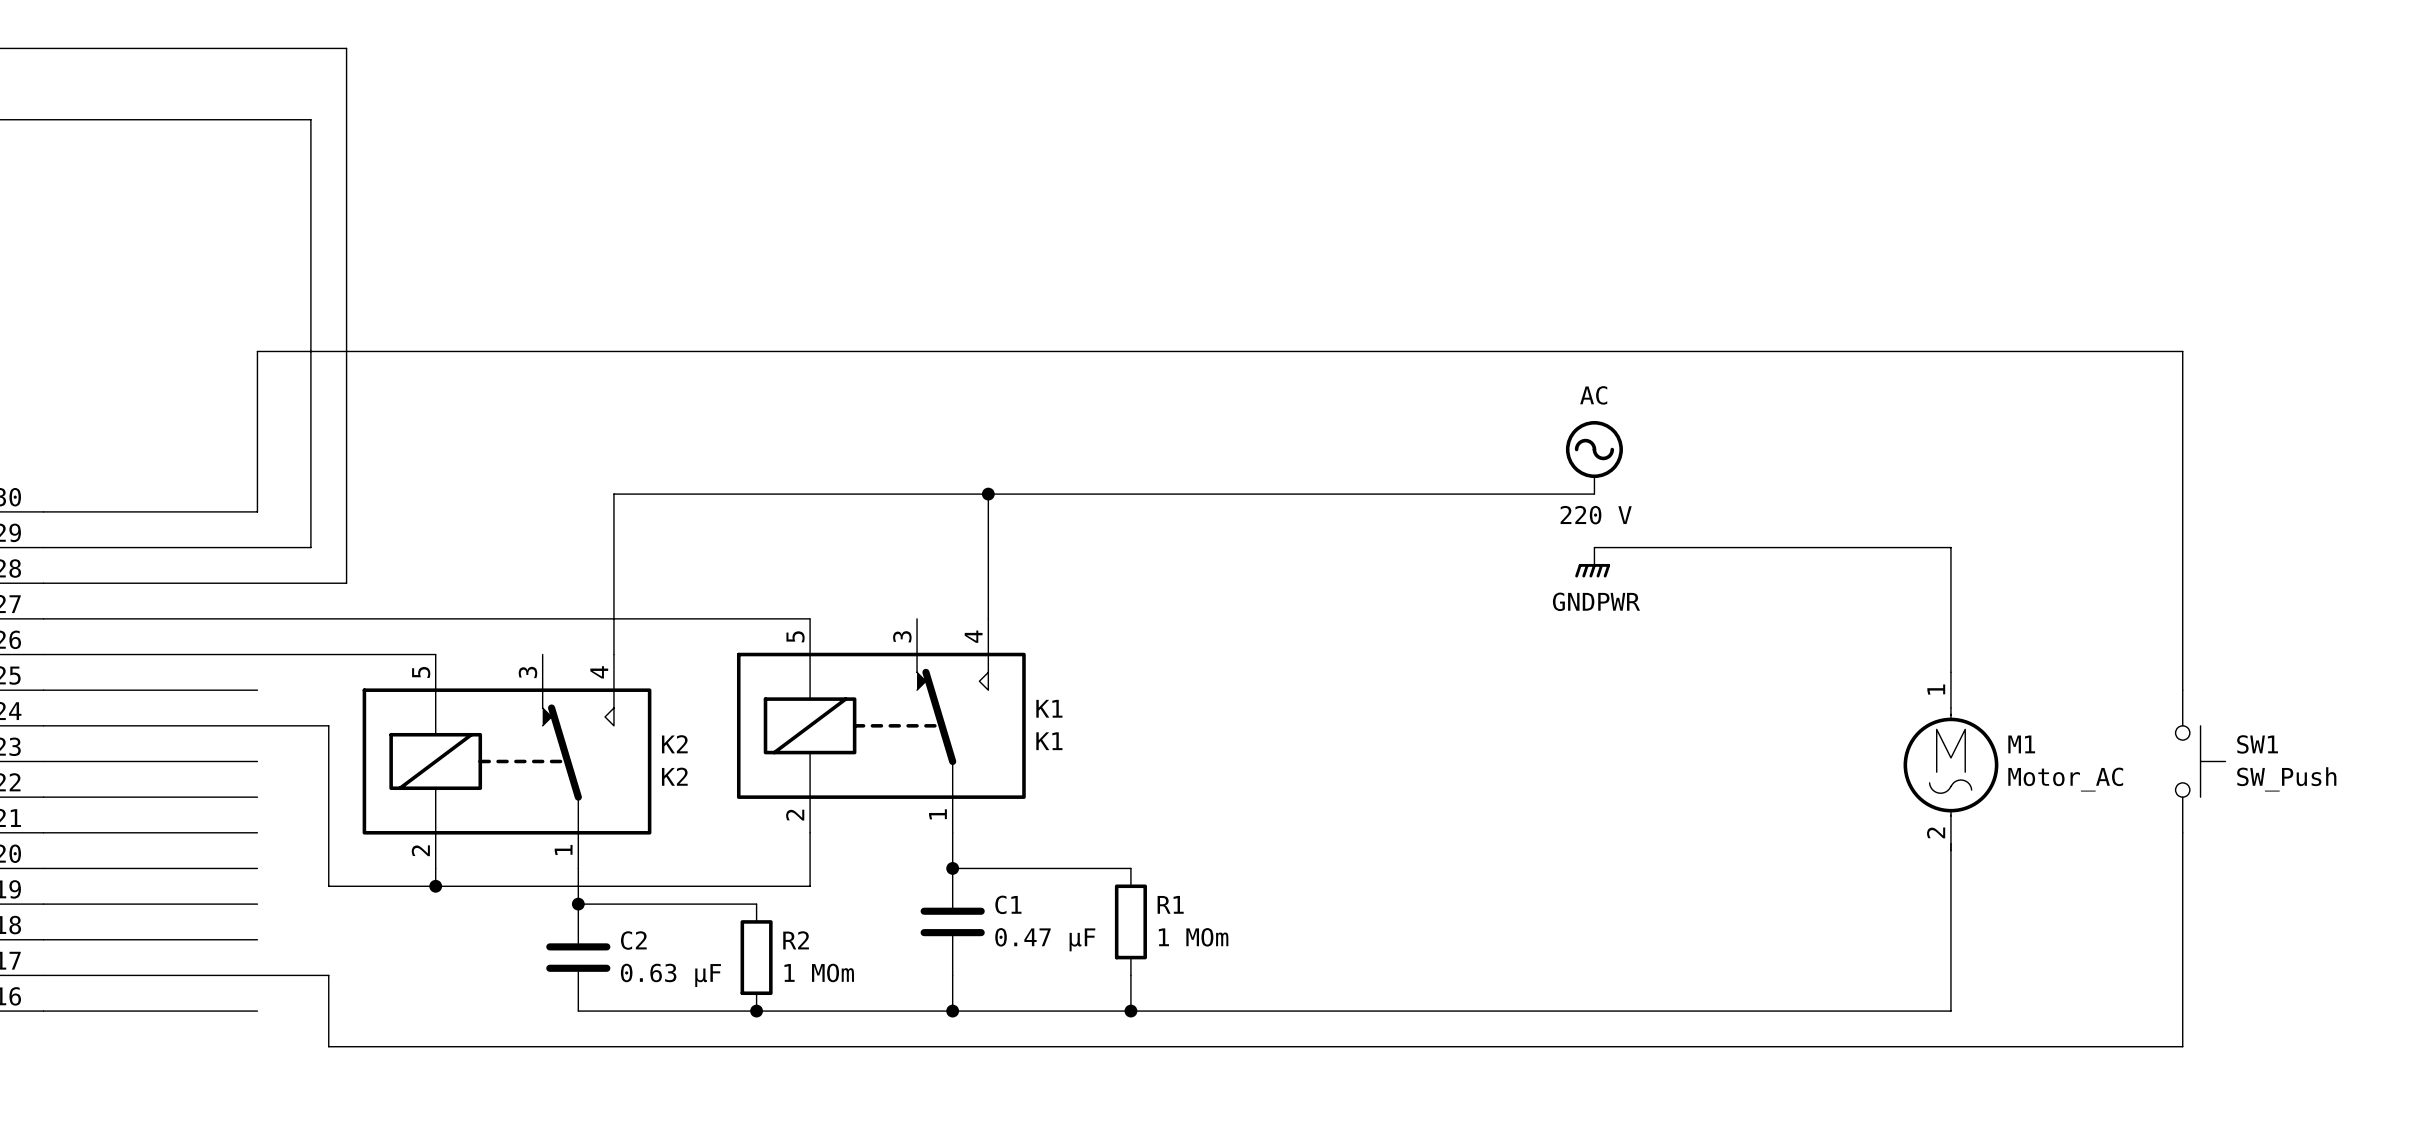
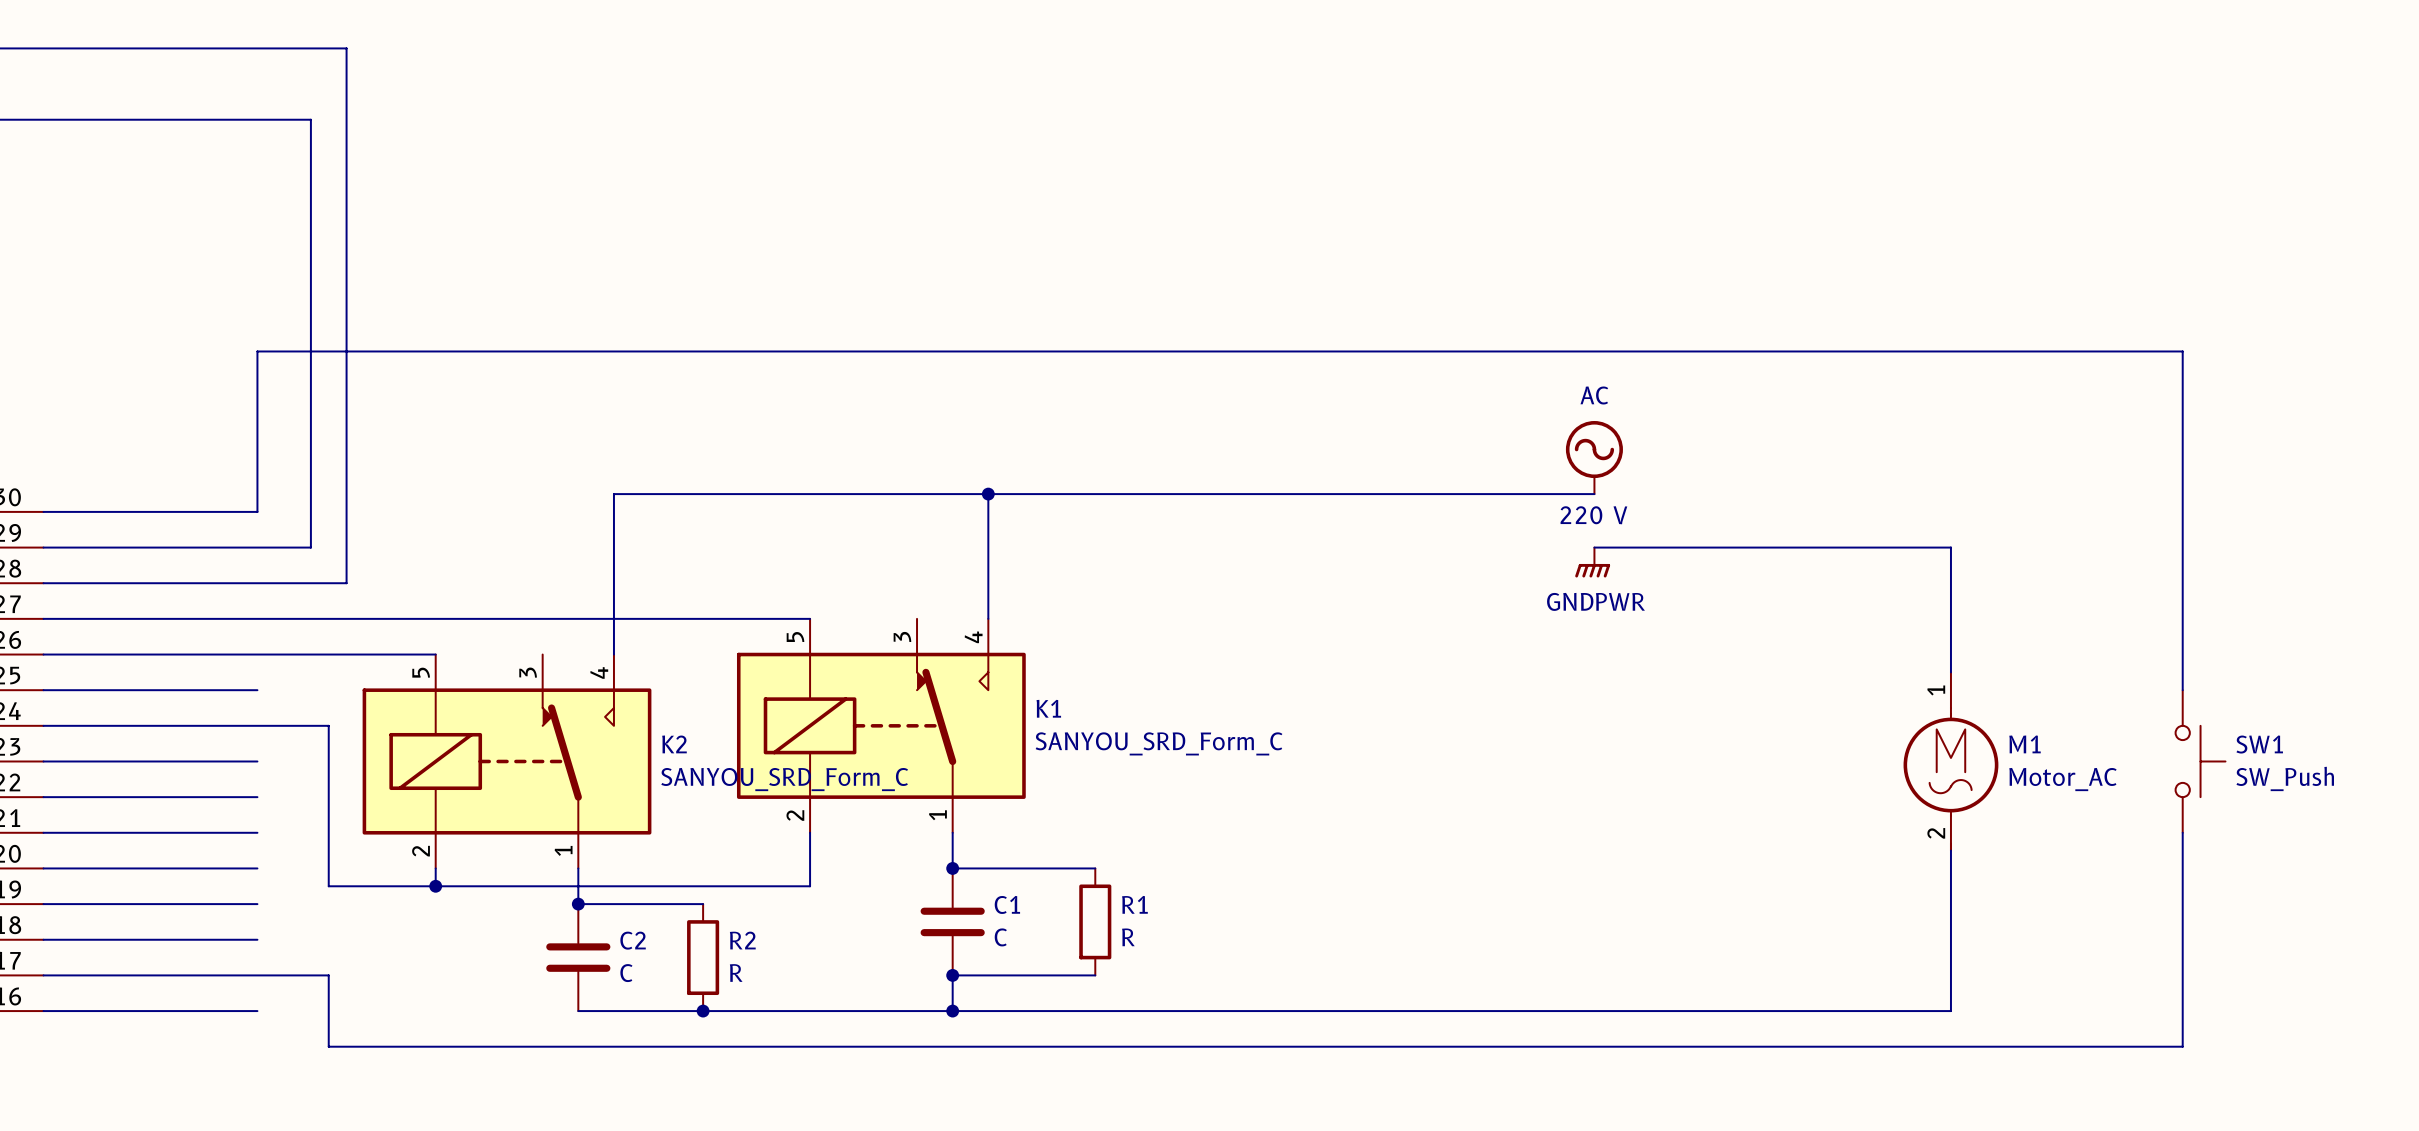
K1 value: K1 (1049, 741) -> SANYOU_SRD_Form_C (1159, 743)
K2 value: K2 (674, 776) -> SANYOU_SRD_Form_C (784, 779)
wire: (1095, 868) (1130, 868) -> none
wire: (703, 904) (756, 904) -> none
R1 position: (1130, 921) -> (1095, 921)
R1 value: 1 MOm (1193, 937) -> R (1128, 937)
C1 value: 0.47 μF (1045, 939) -> C (1000, 937)
R2 position: (756, 957) -> (703, 957)
R2 value: 1 MOm (819, 972) -> R (736, 973)
C2 value: 0.63 μF (670, 975) -> C (626, 973)
wire: none -> (952, 975) (1095, 975)
junction: none -> (952, 975)
wire: (1130, 975) (1130, 1011) -> none
junction position: (756, 1011) -> (703, 1011)
junction: (1130, 1011) -> none

